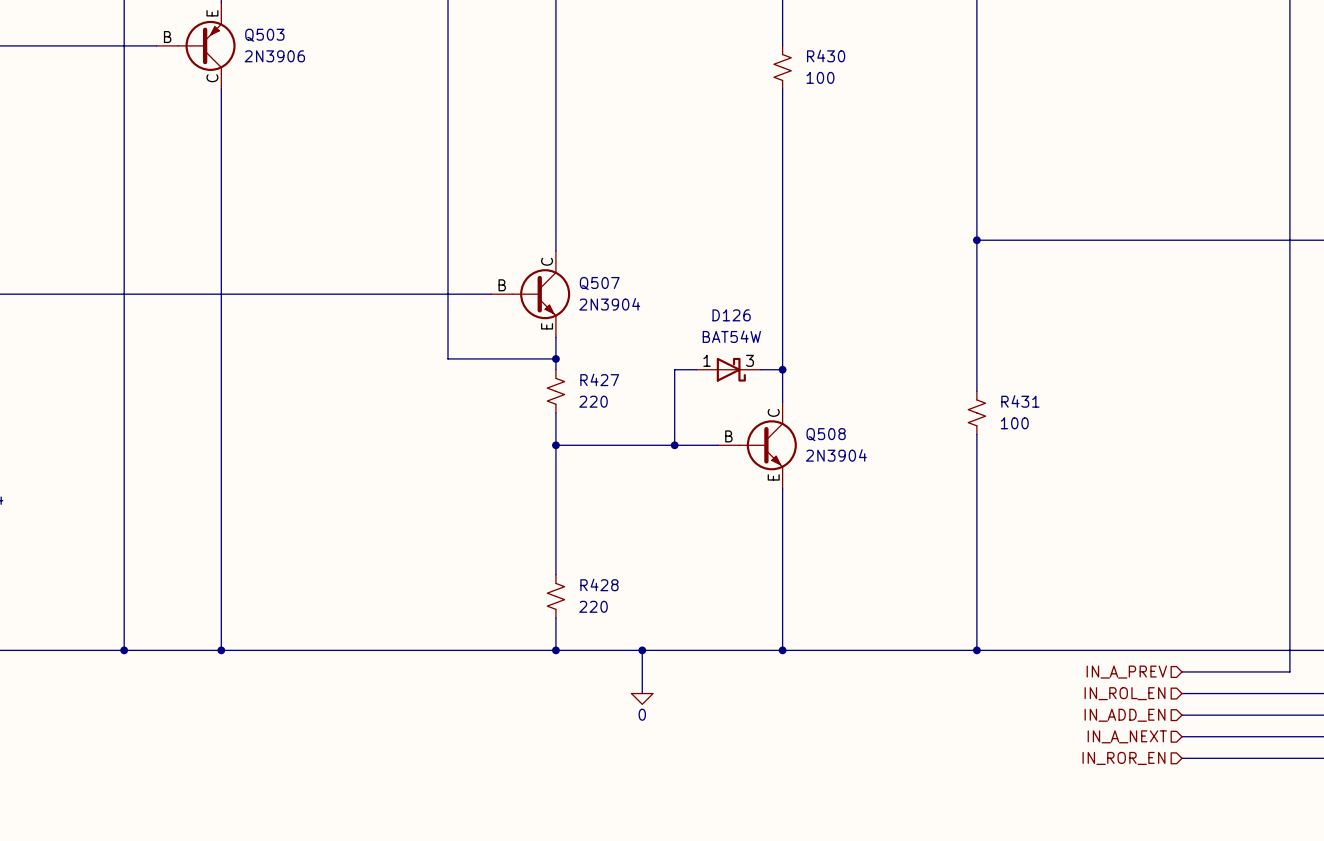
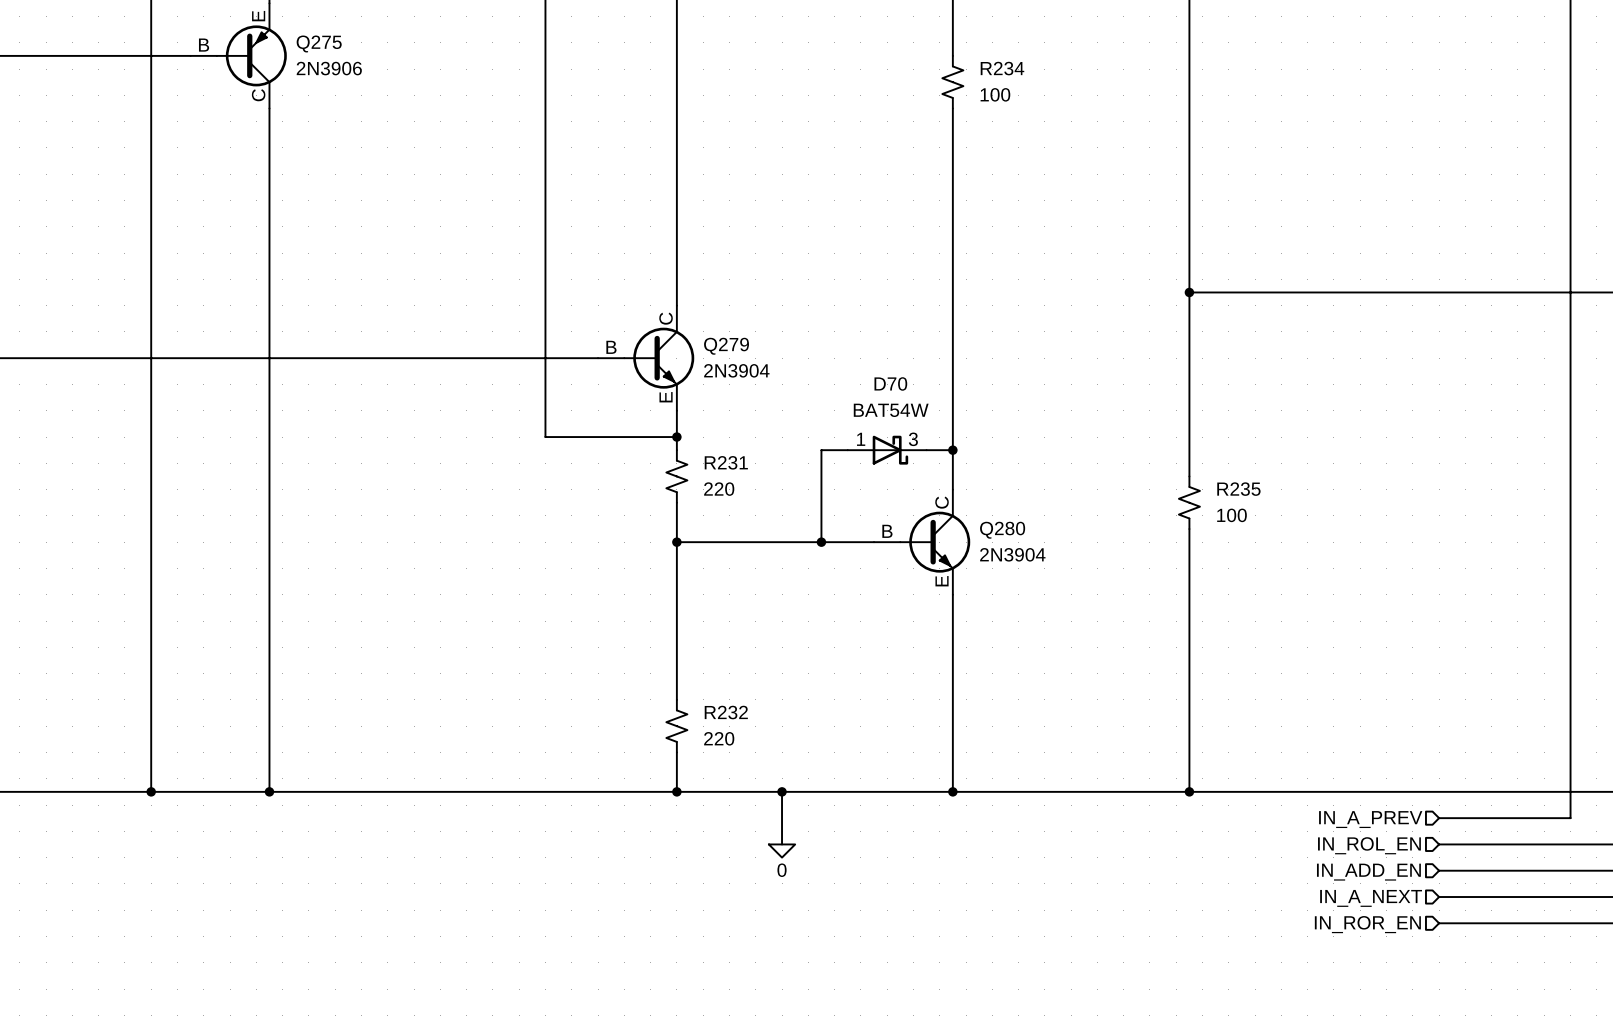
Q503 name: Q503 (264, 35) -> Q275 (319, 43)
R430 name: R430 (826, 56) -> R234 (1002, 68)
Q507 name: Q507 (599, 283) -> Q279 (726, 346)
D126 name: D126 (731, 315) -> D70 (890, 383)
R427 name: R427 (599, 379) -> R231 (726, 462)
R431 name: R431 (1020, 401) -> R235 (1238, 489)
Q508 name: Q508 (826, 434) -> Q280 (1002, 530)
R428 name: R428 (599, 584) -> R232 (726, 712)

